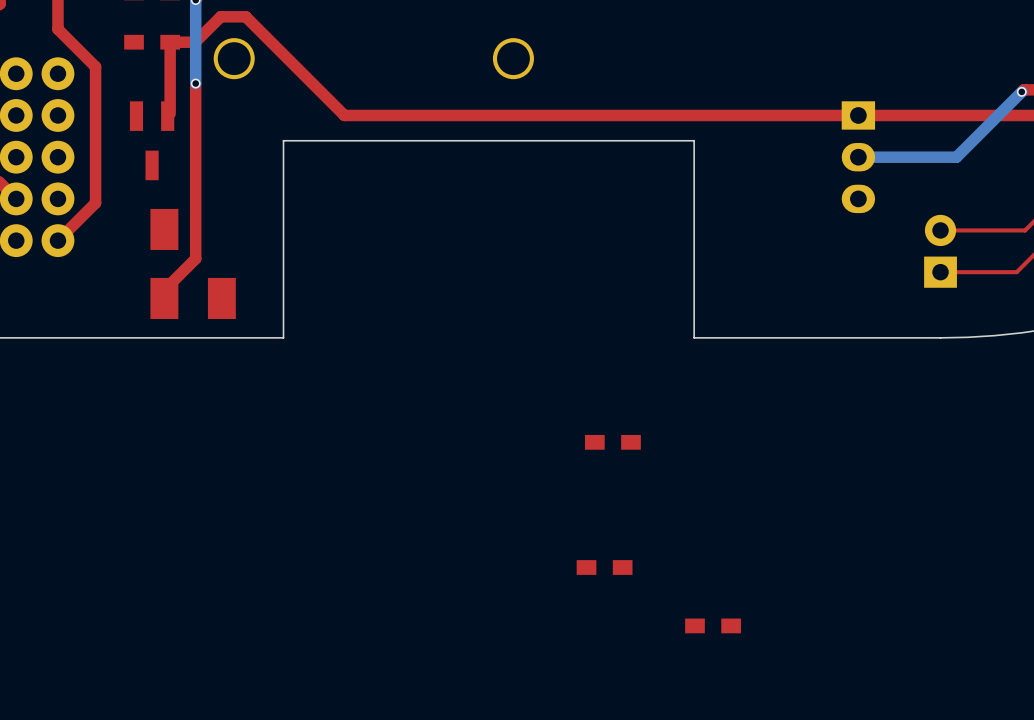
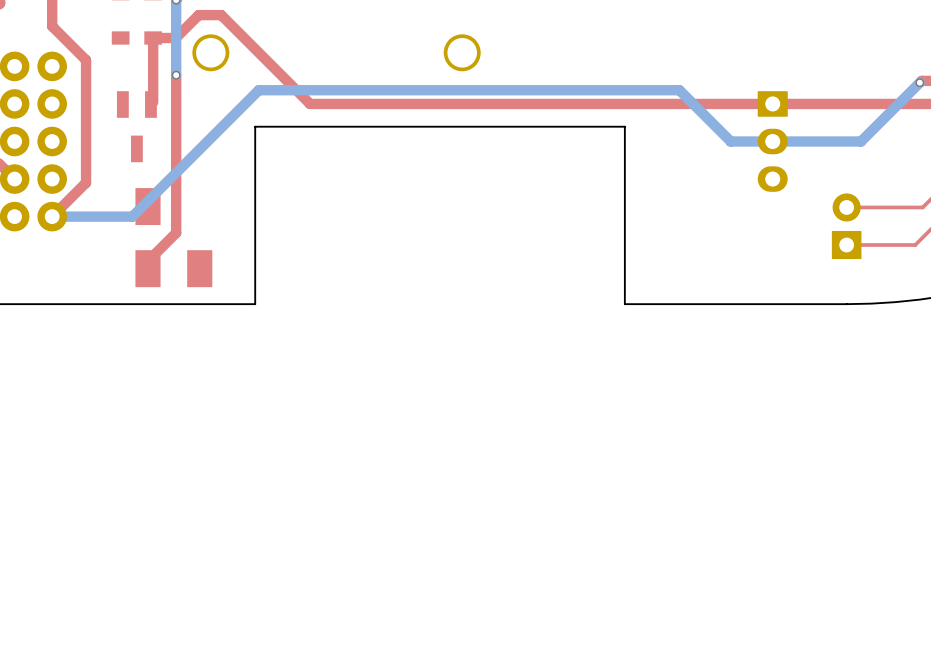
bottom track: none -> (772, 141) (730, 141) (679, 90) (258, 90) (132, 216) (52, 216)
part: (612, 442) -> none
part: (604, 567) -> none
part: (713, 625) -> none

